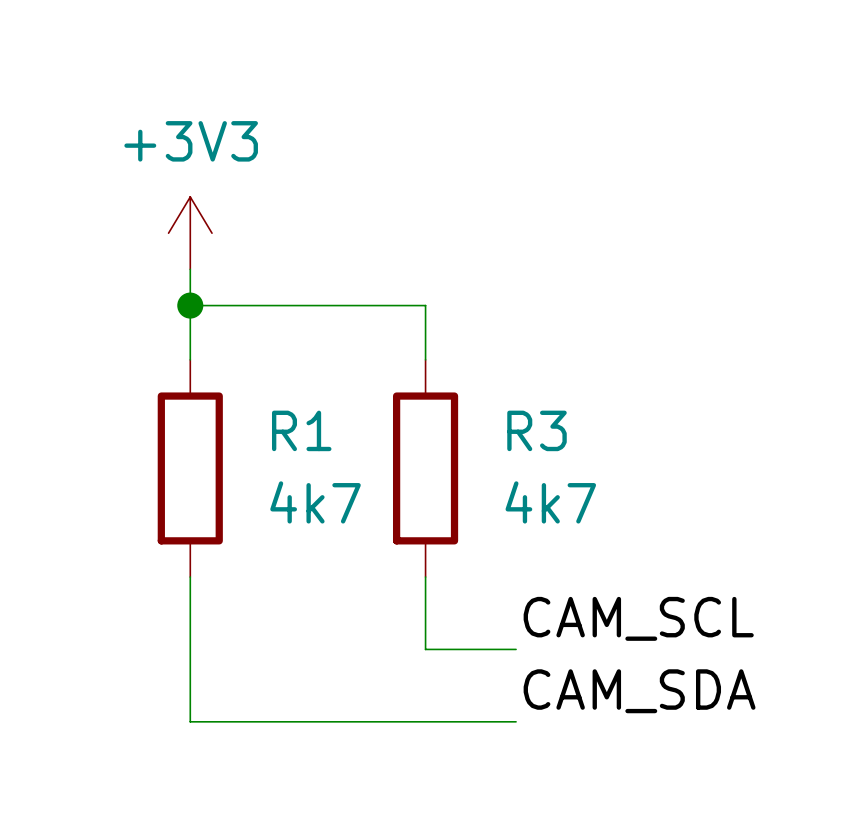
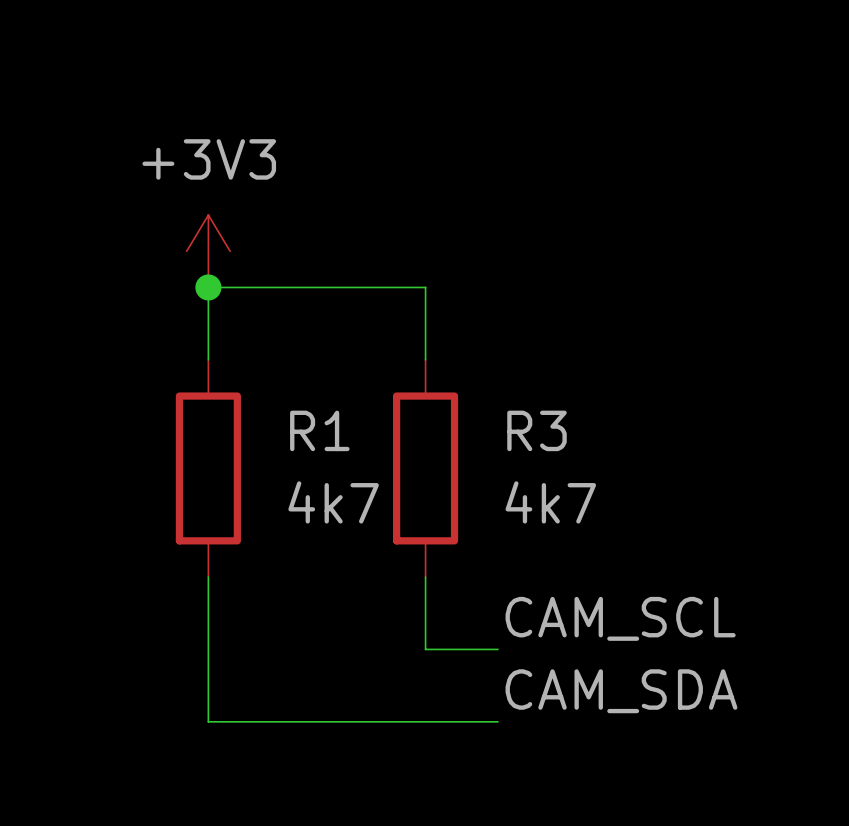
power symbol position: +3V3 (190, 233) -> +3V3 (208, 251)
wire: (190, 269) (190, 359) -> none
wire: (190, 305) (425, 305) -> (208, 359) (208, 287) (425, 287) (425, 305)
junction position: (190, 305) -> (208, 287)
R1 position: (190, 468) -> (208, 468)
wire: (190, 577) (190, 721) (208, 721) -> (208, 577) (208, 721)
label position: CAM_SCL (638, 618) -> CAM_SCL (620, 618)
wire: (497, 649) (516, 649) -> none
label position: CAM_SDA (639, 691) -> CAM_SDA (621, 691)
wire: (497, 721) (516, 721) -> none

